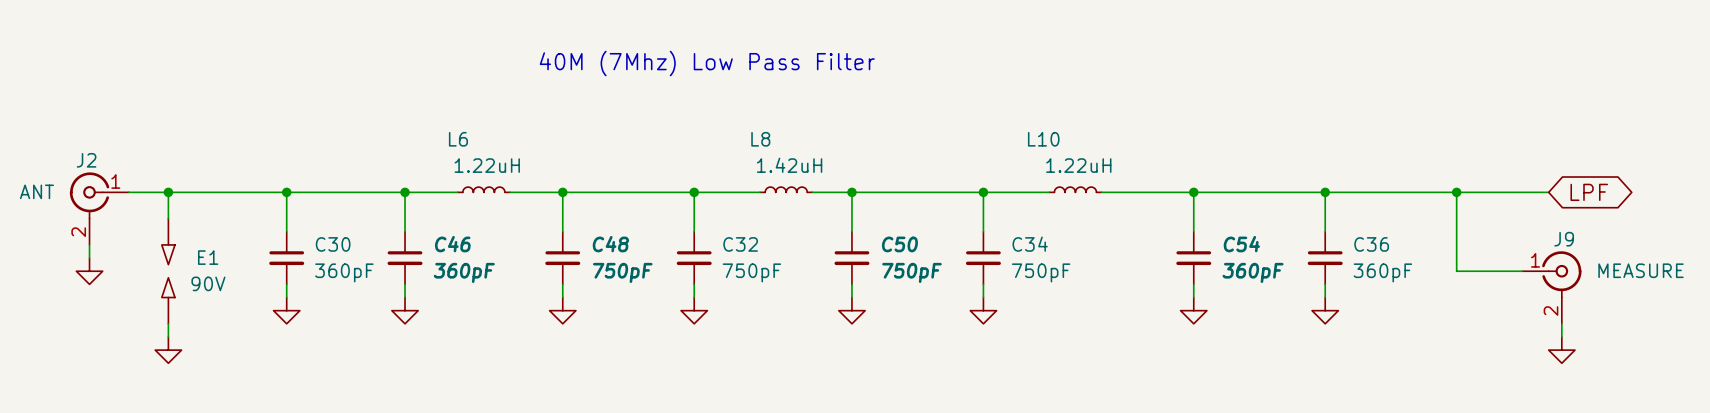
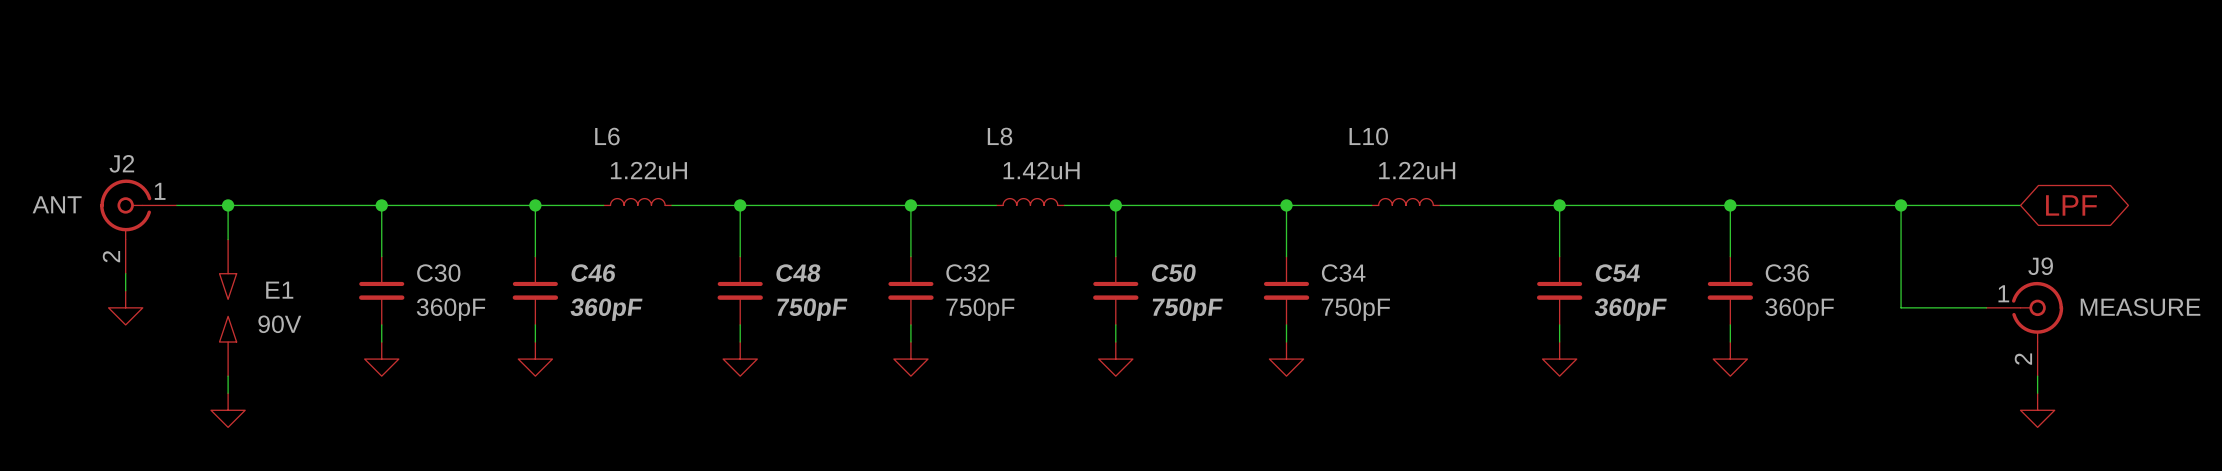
text: 40M (7Mhz) Low Pass Filter (707, 63) -> none

